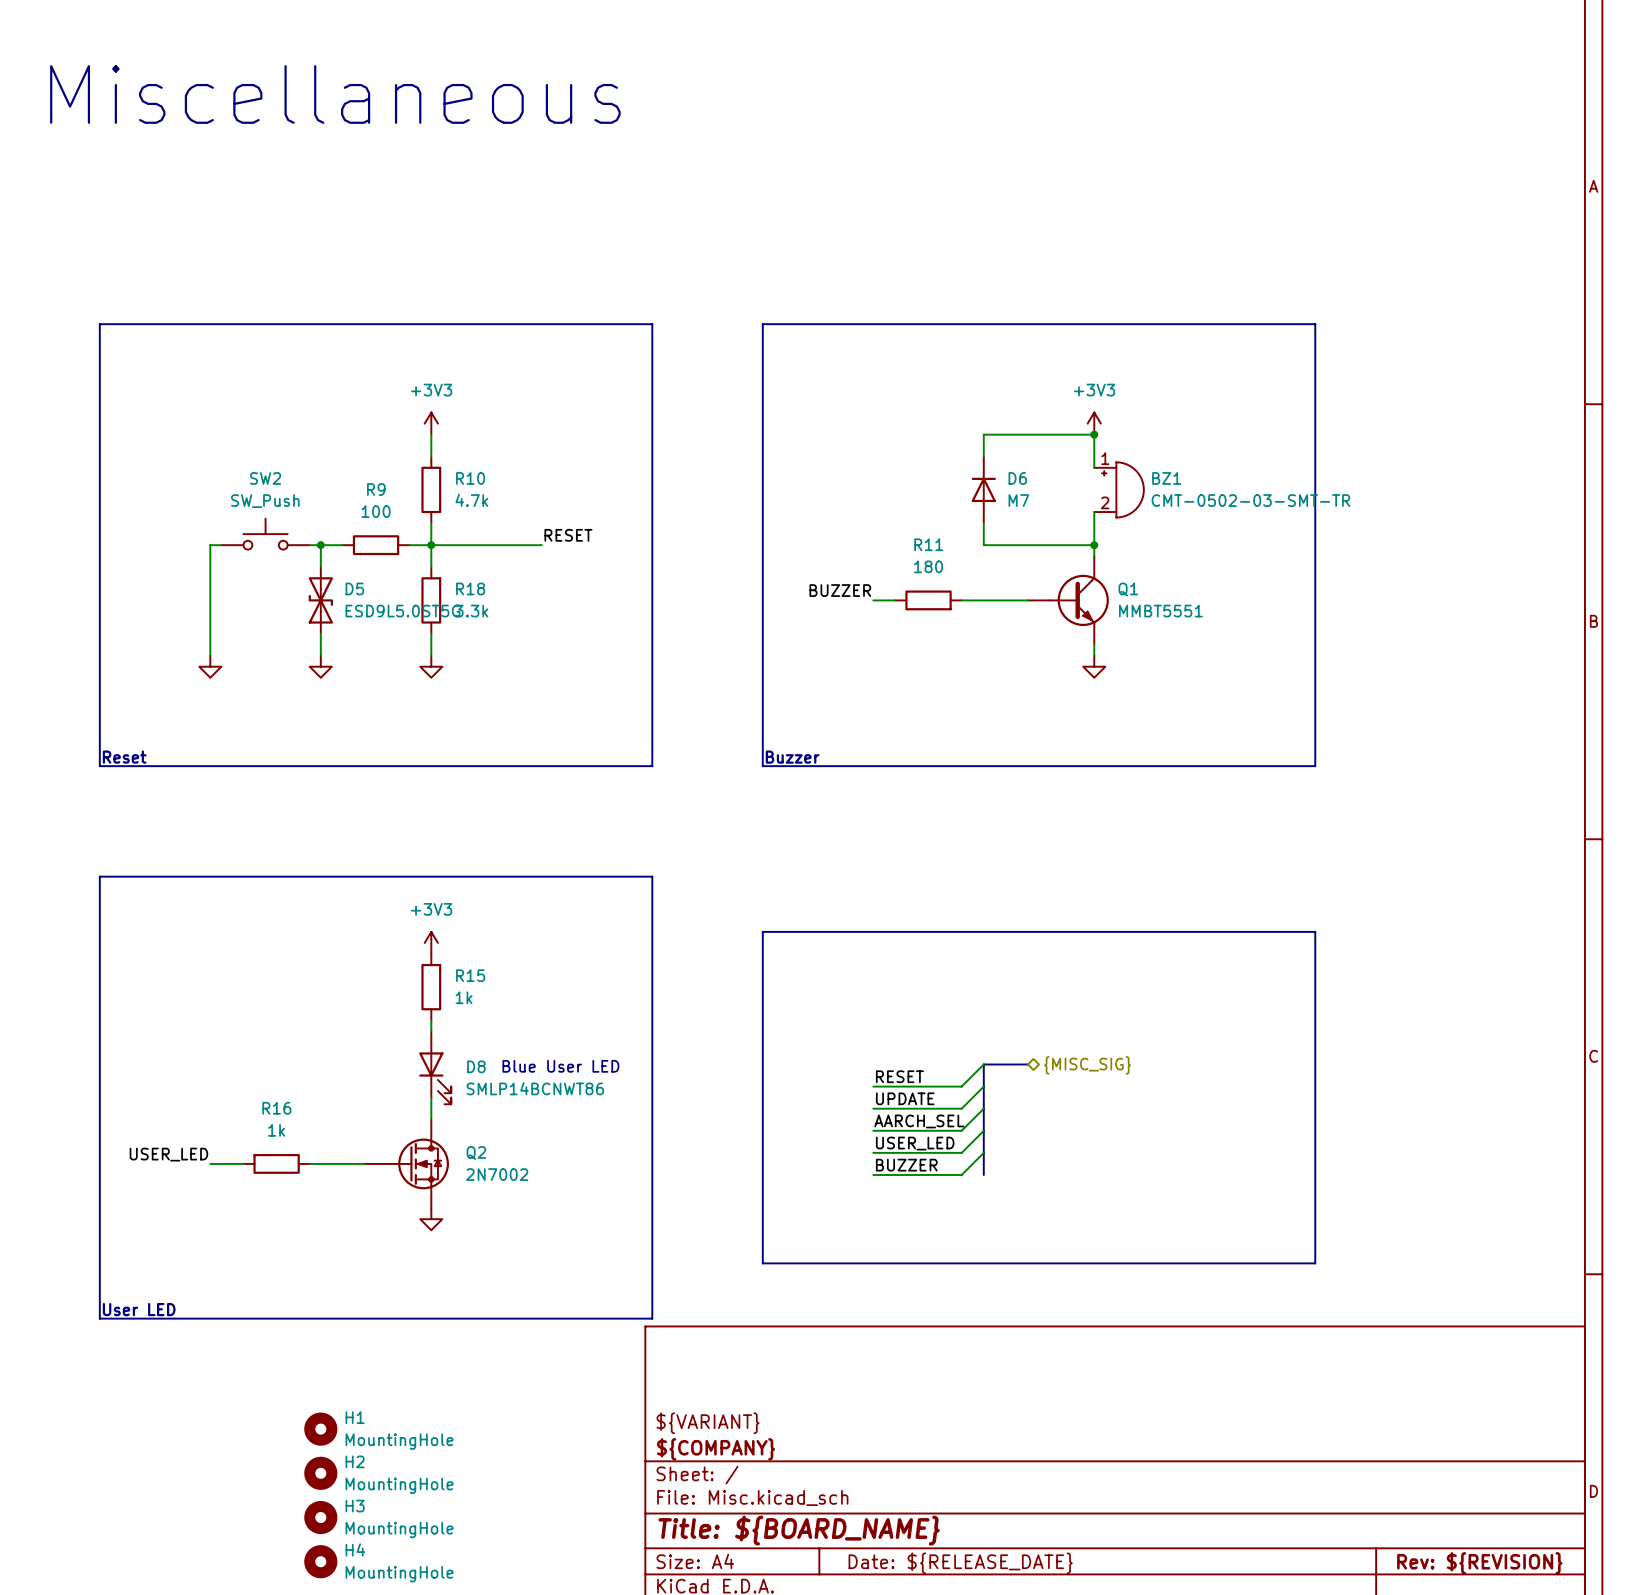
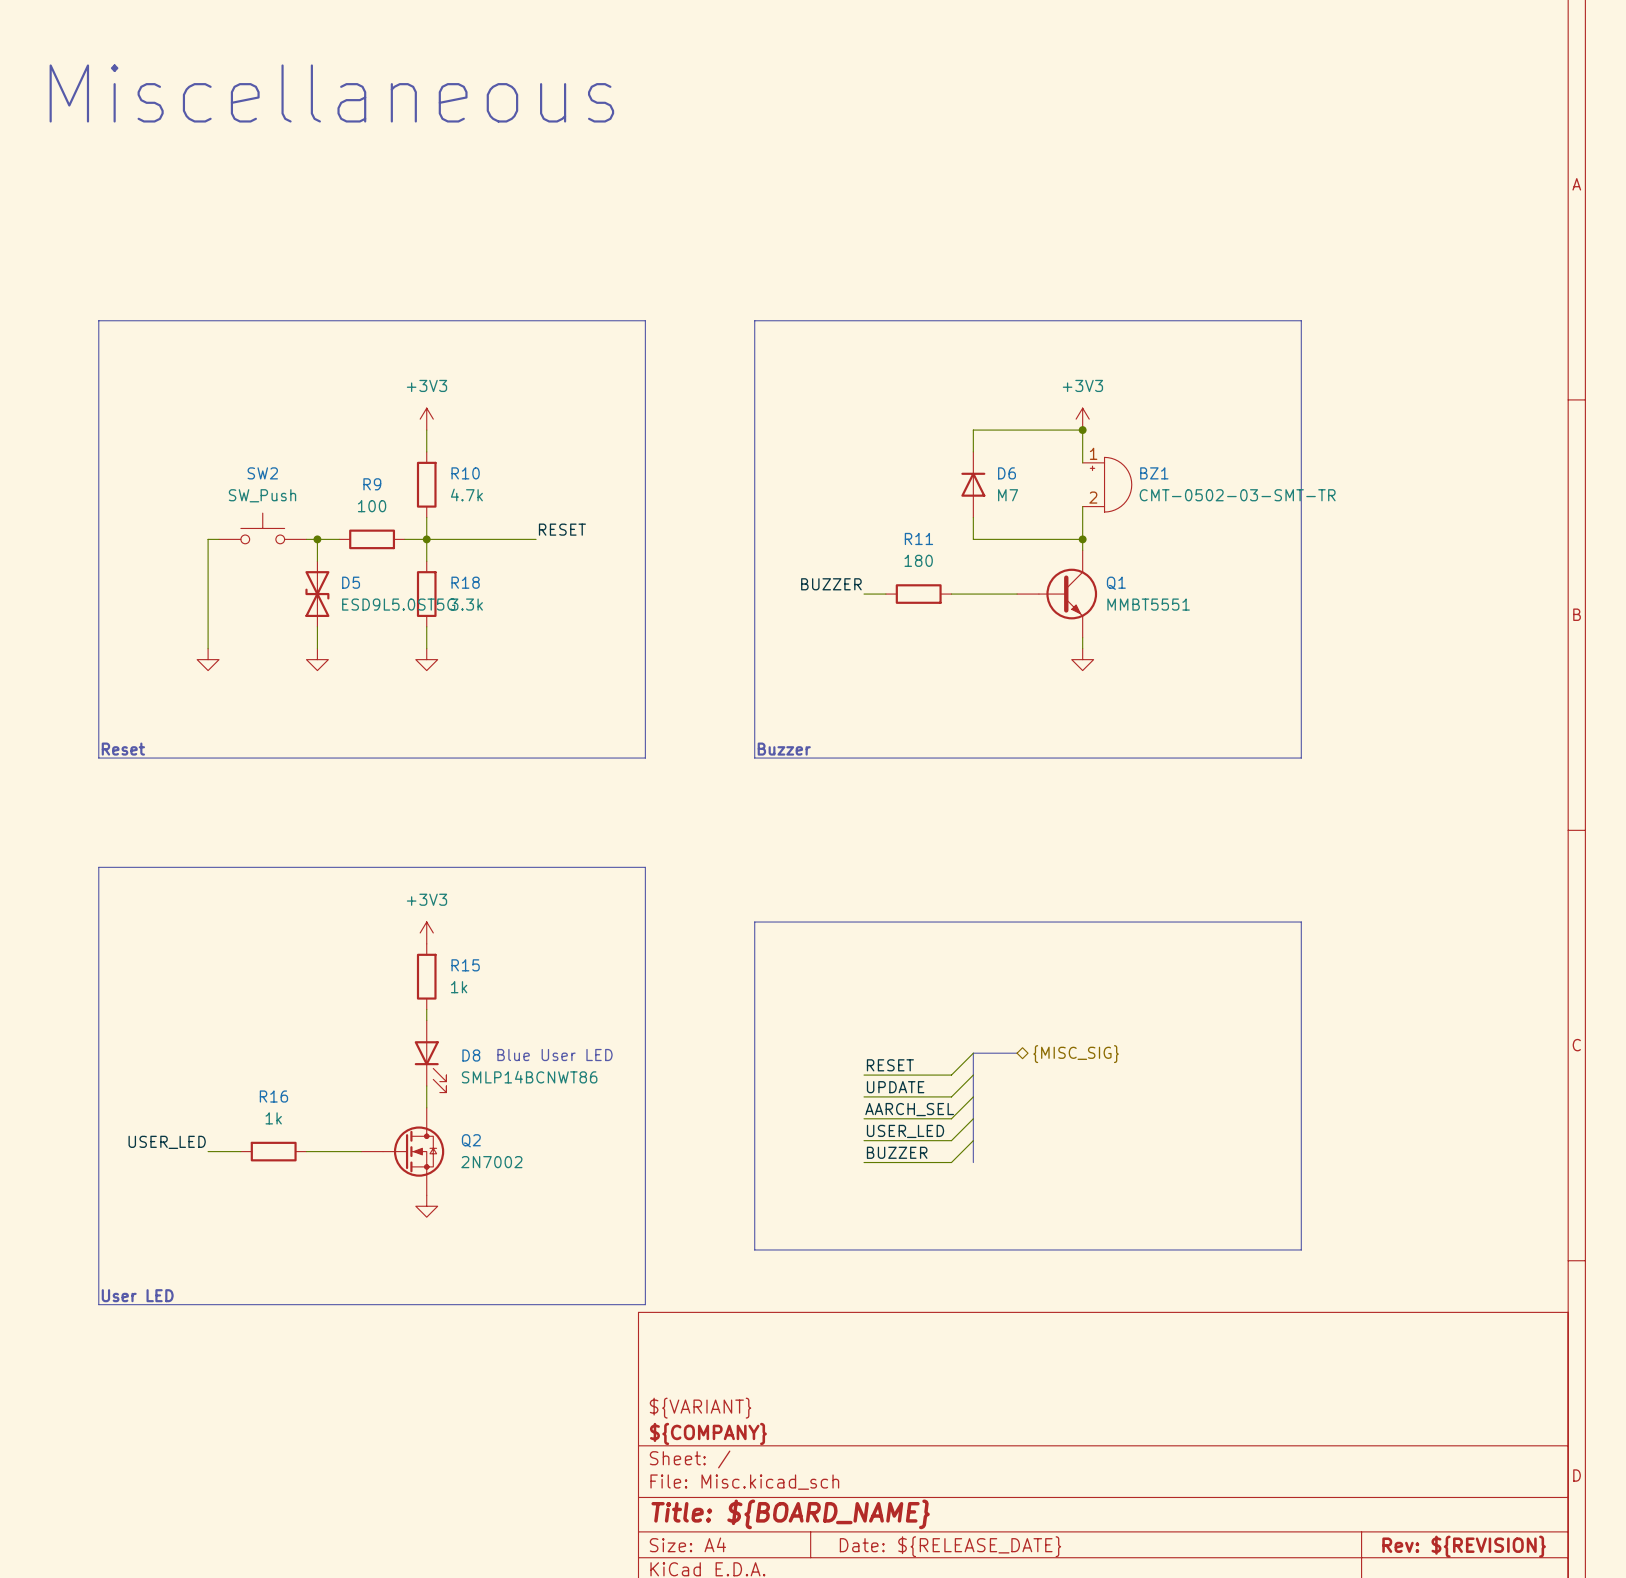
H1: MountingHole (320, 1429) -> none
H2: MountingHole (320, 1473) -> none
H3: MountingHole (320, 1517) -> none
H4: MountingHole (320, 1561) -> none

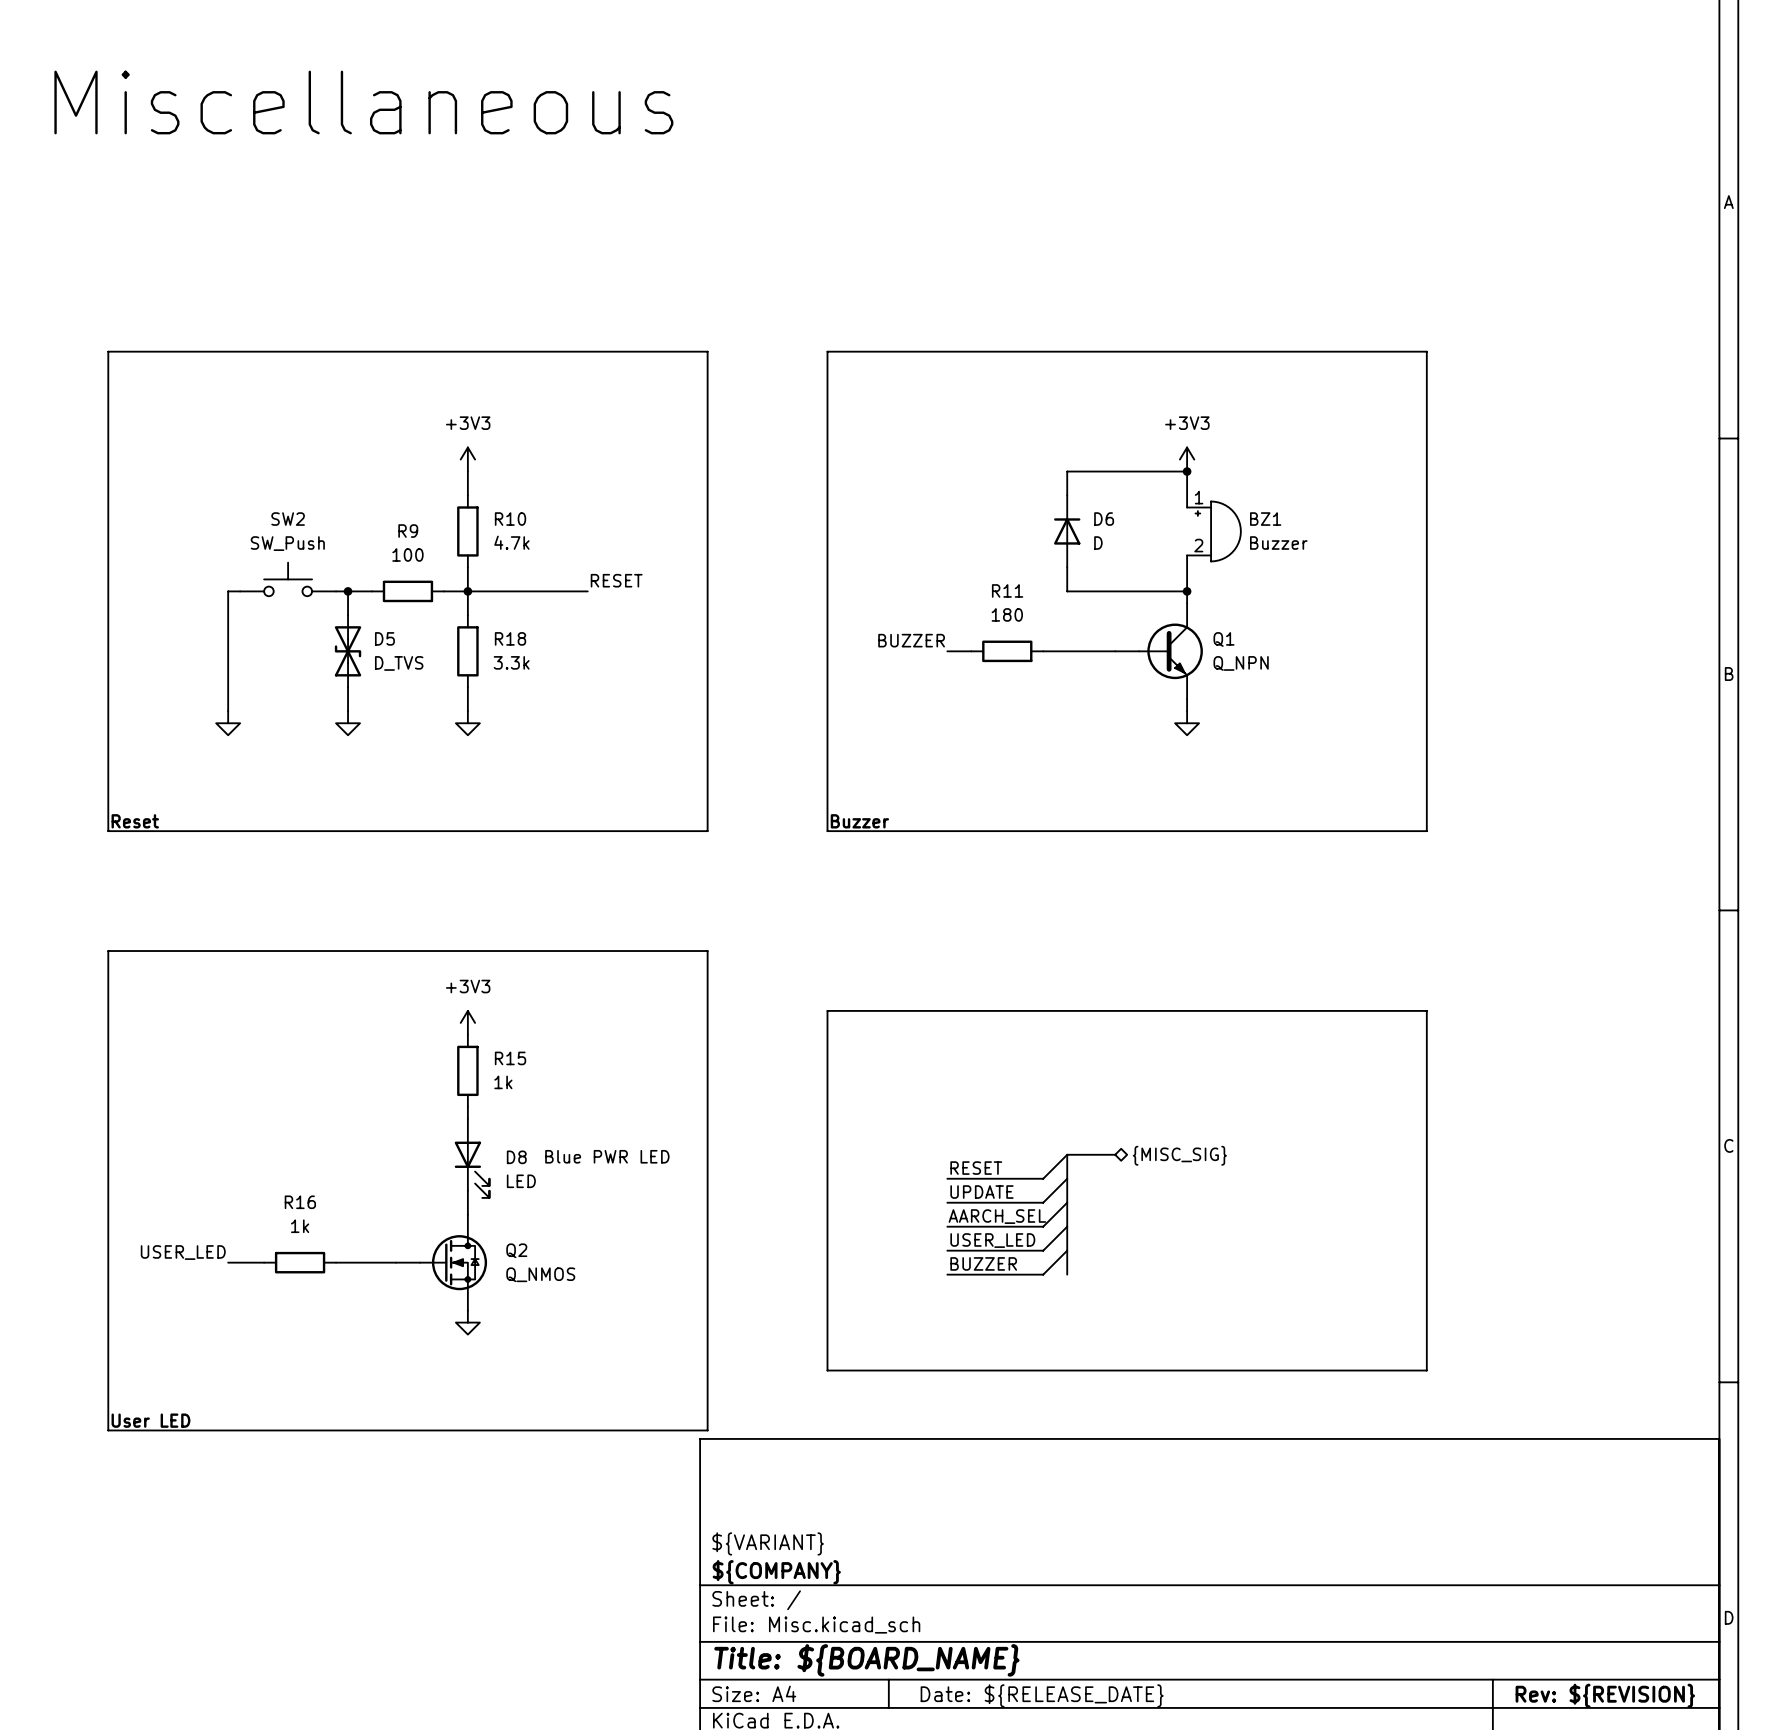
D6 value: M7 (1008, 495) -> D (1098, 543)
BZ1 value: CMT-0502-03-SMT-TR (1237, 495) -> Buzzer (1278, 543)
D5 value: ESD9L5.0ST5G (398, 604) -> D_TVS (399, 663)
Q1 value: MMBT5551 (1148, 604) -> Q_NPN (1241, 663)
text: Blue User LED (554, 1055) -> Blue PWR LED (607, 1156)
D8 value: SMLP14BCNWT86 (529, 1077) -> LED (521, 1181)
Q2 value: 2N7002 (491, 1162) -> Q_NMOS (540, 1274)

